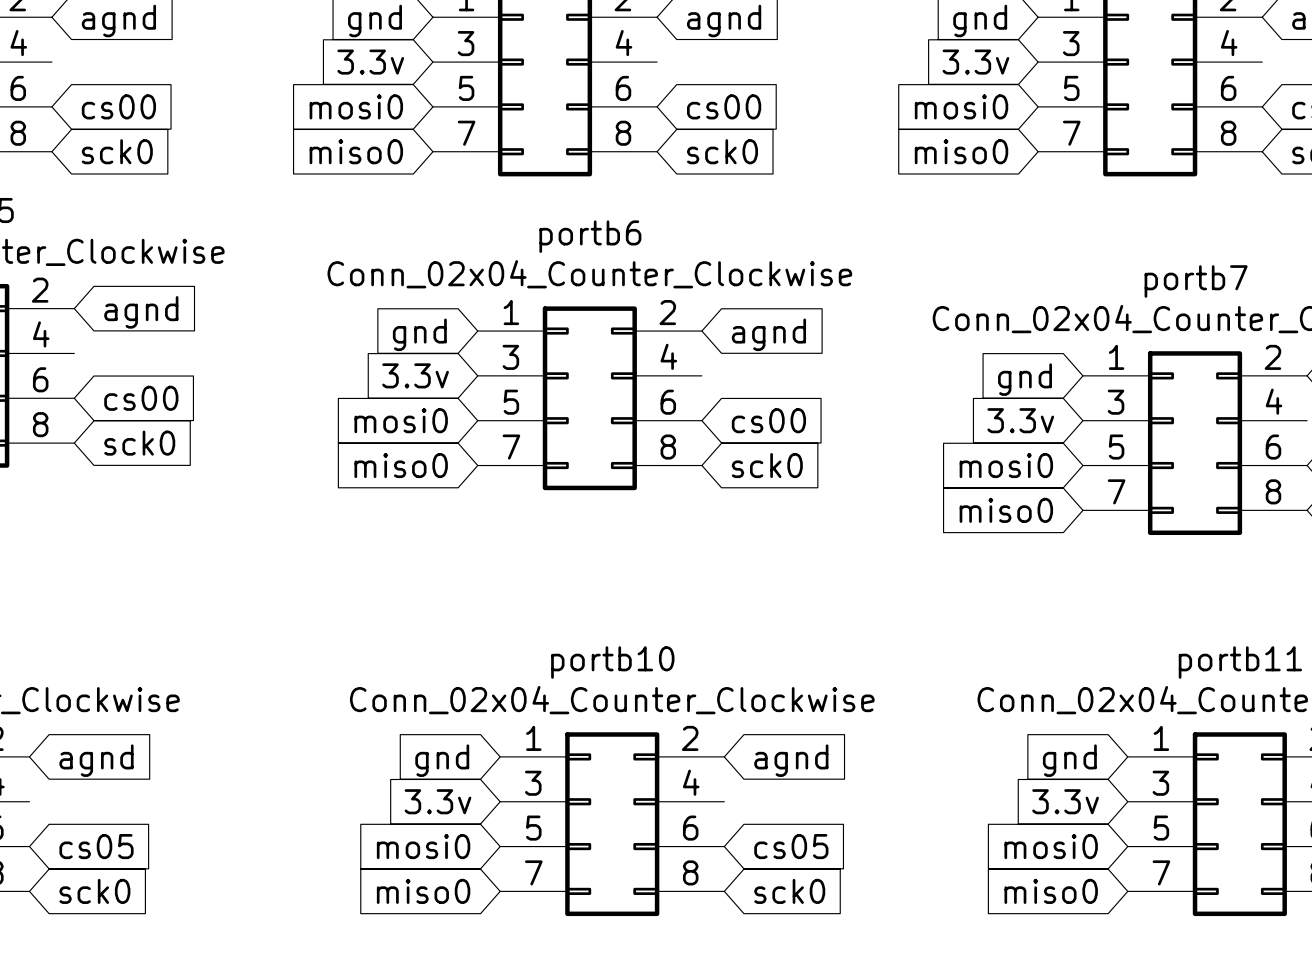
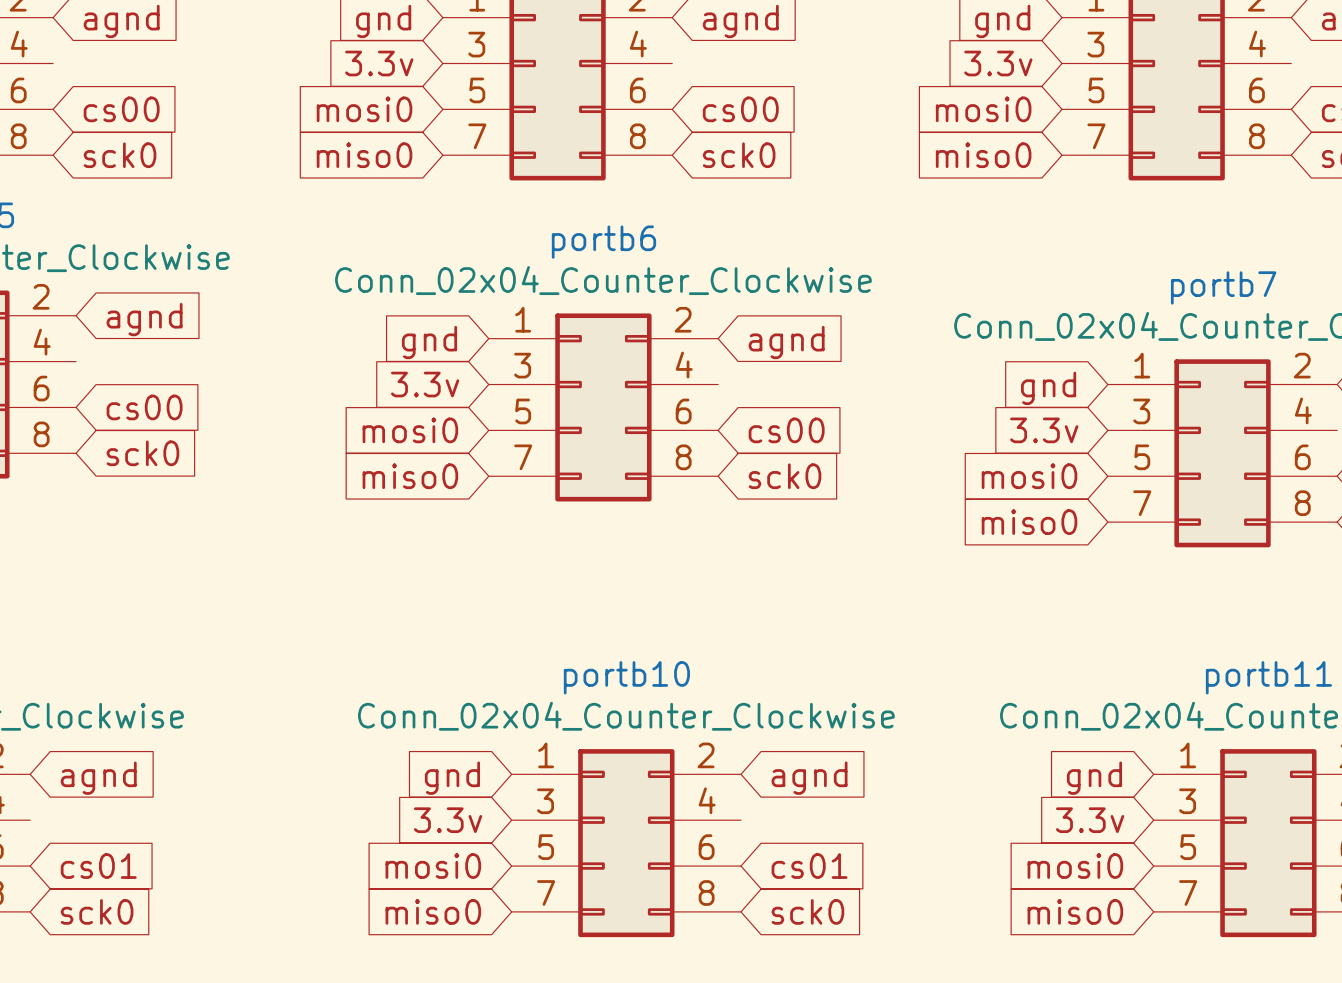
global label: cs05 (96, 846) -> cs01 (98, 866)
global label: cs05 (791, 846) -> cs01 (809, 866)

